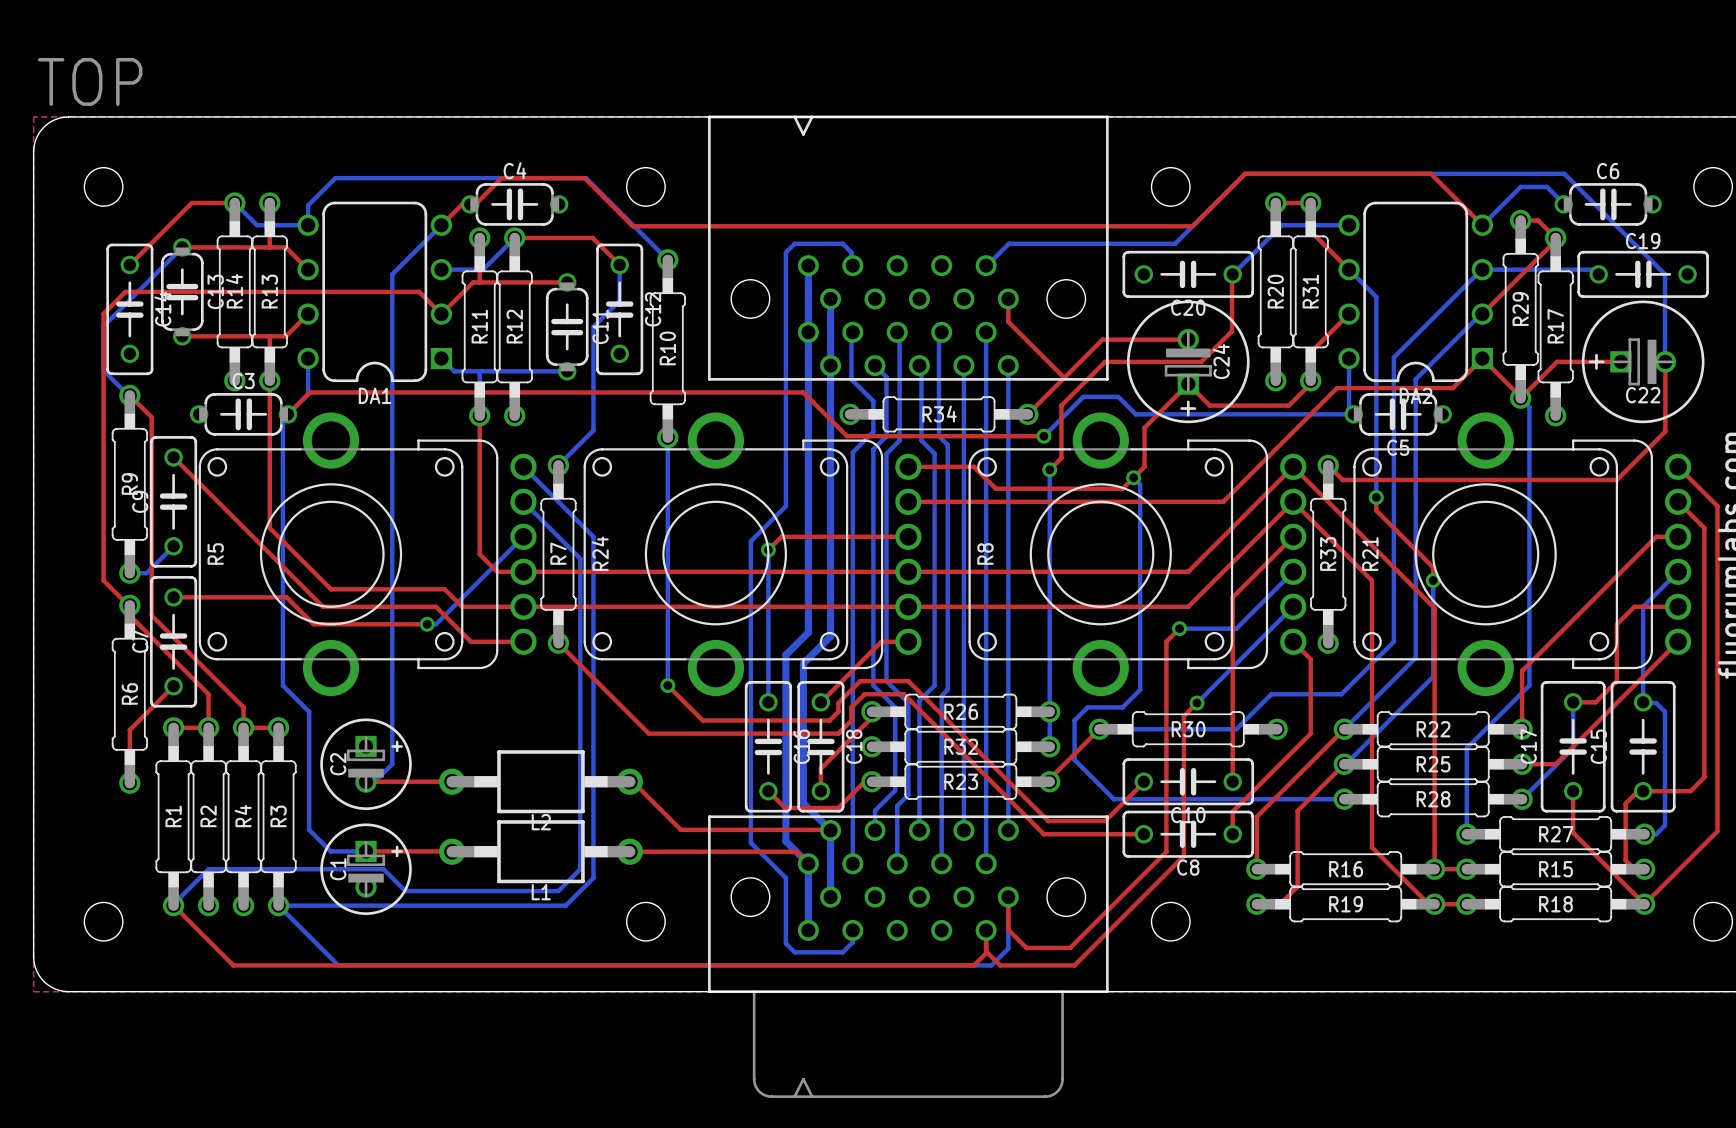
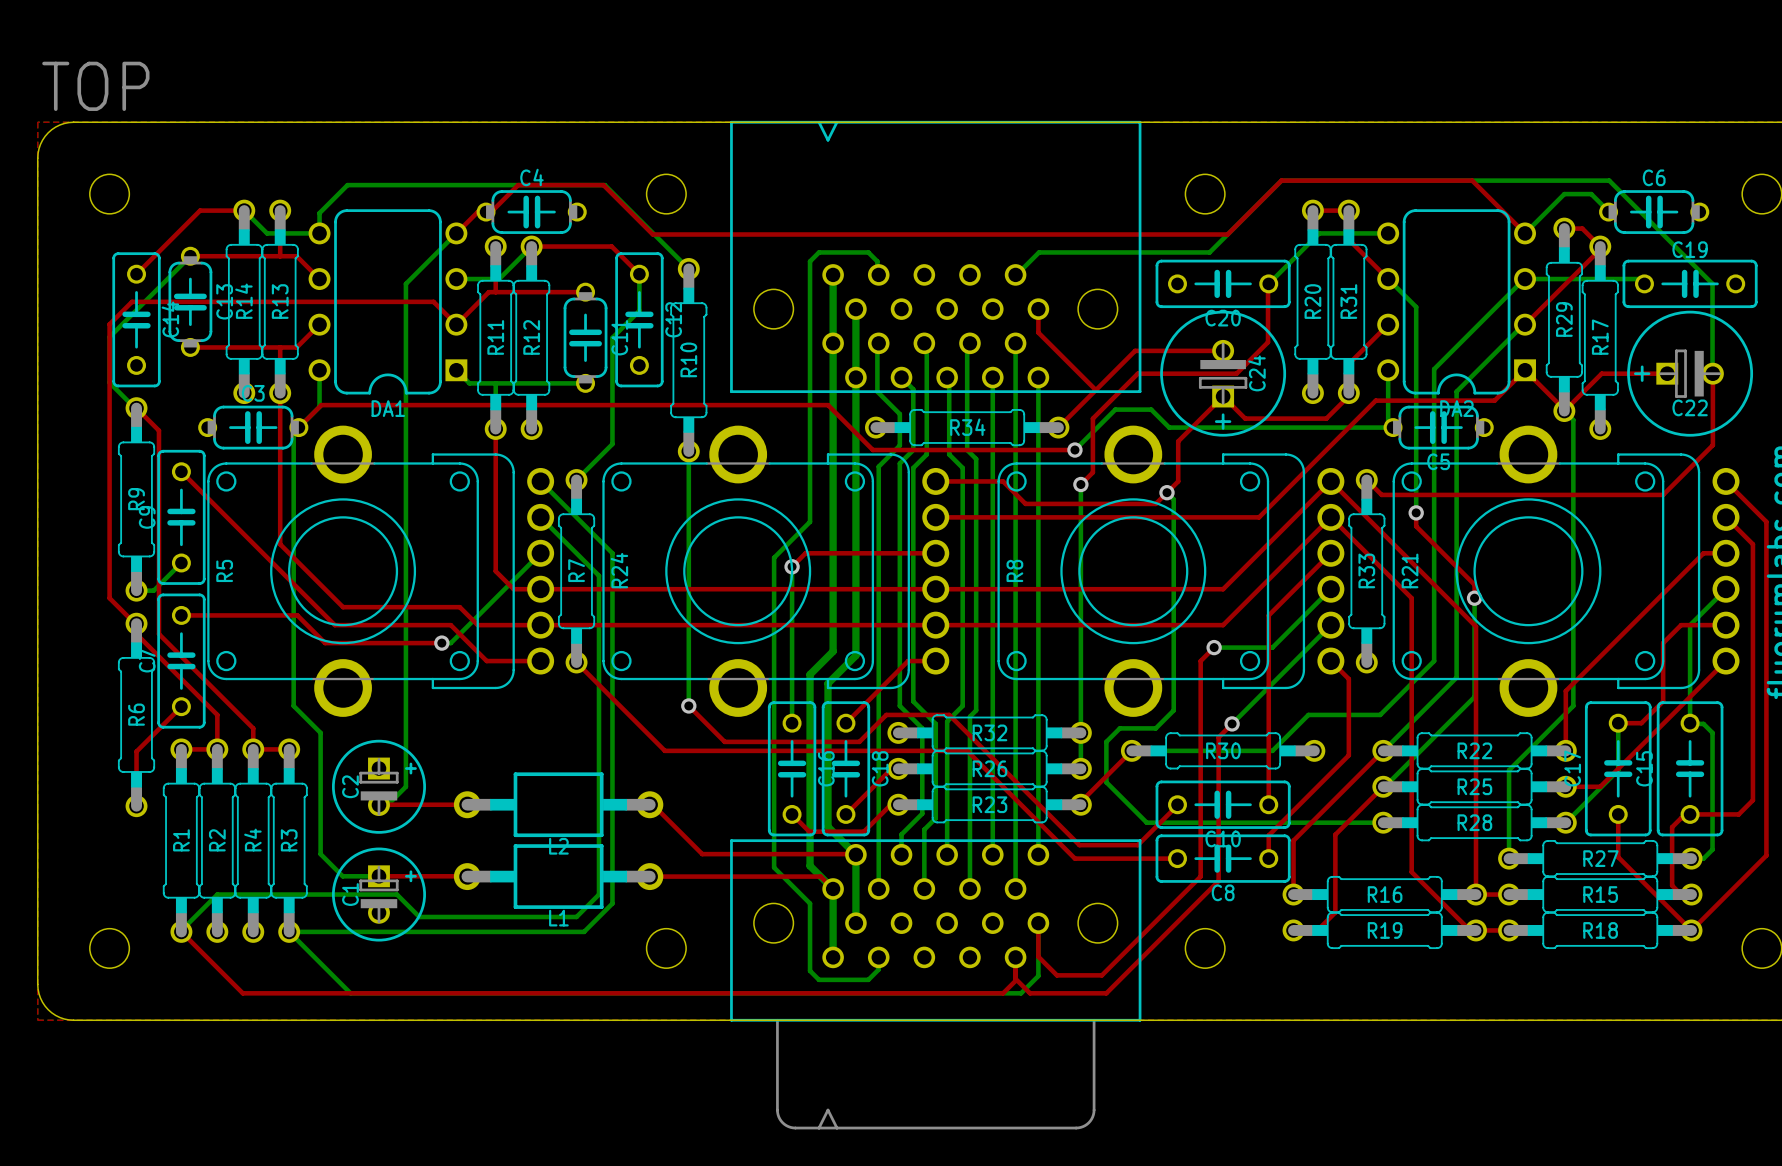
top track: (864, 694) (851, 707) (851, 720) (838, 733) (648, 733) (644, 729) -> (967, 750) (664, 750)
top track: (903, 694) (938, 729) -> (931, 714) (949, 714)
top track: (921, 694) (908, 681) (860, 681) (838, 703) (838, 711) (829, 720) -> (890, 714) (886, 714) (859, 741) (854, 741)
top track: (871, 711) (871, 717) (820, 768) (820, 791) -> (898, 768) (891, 768) (845, 814)
R26 name: R26 (961, 711) -> R32 (989, 732)
R32 name: R32 (961, 746) -> R26 (989, 768)

